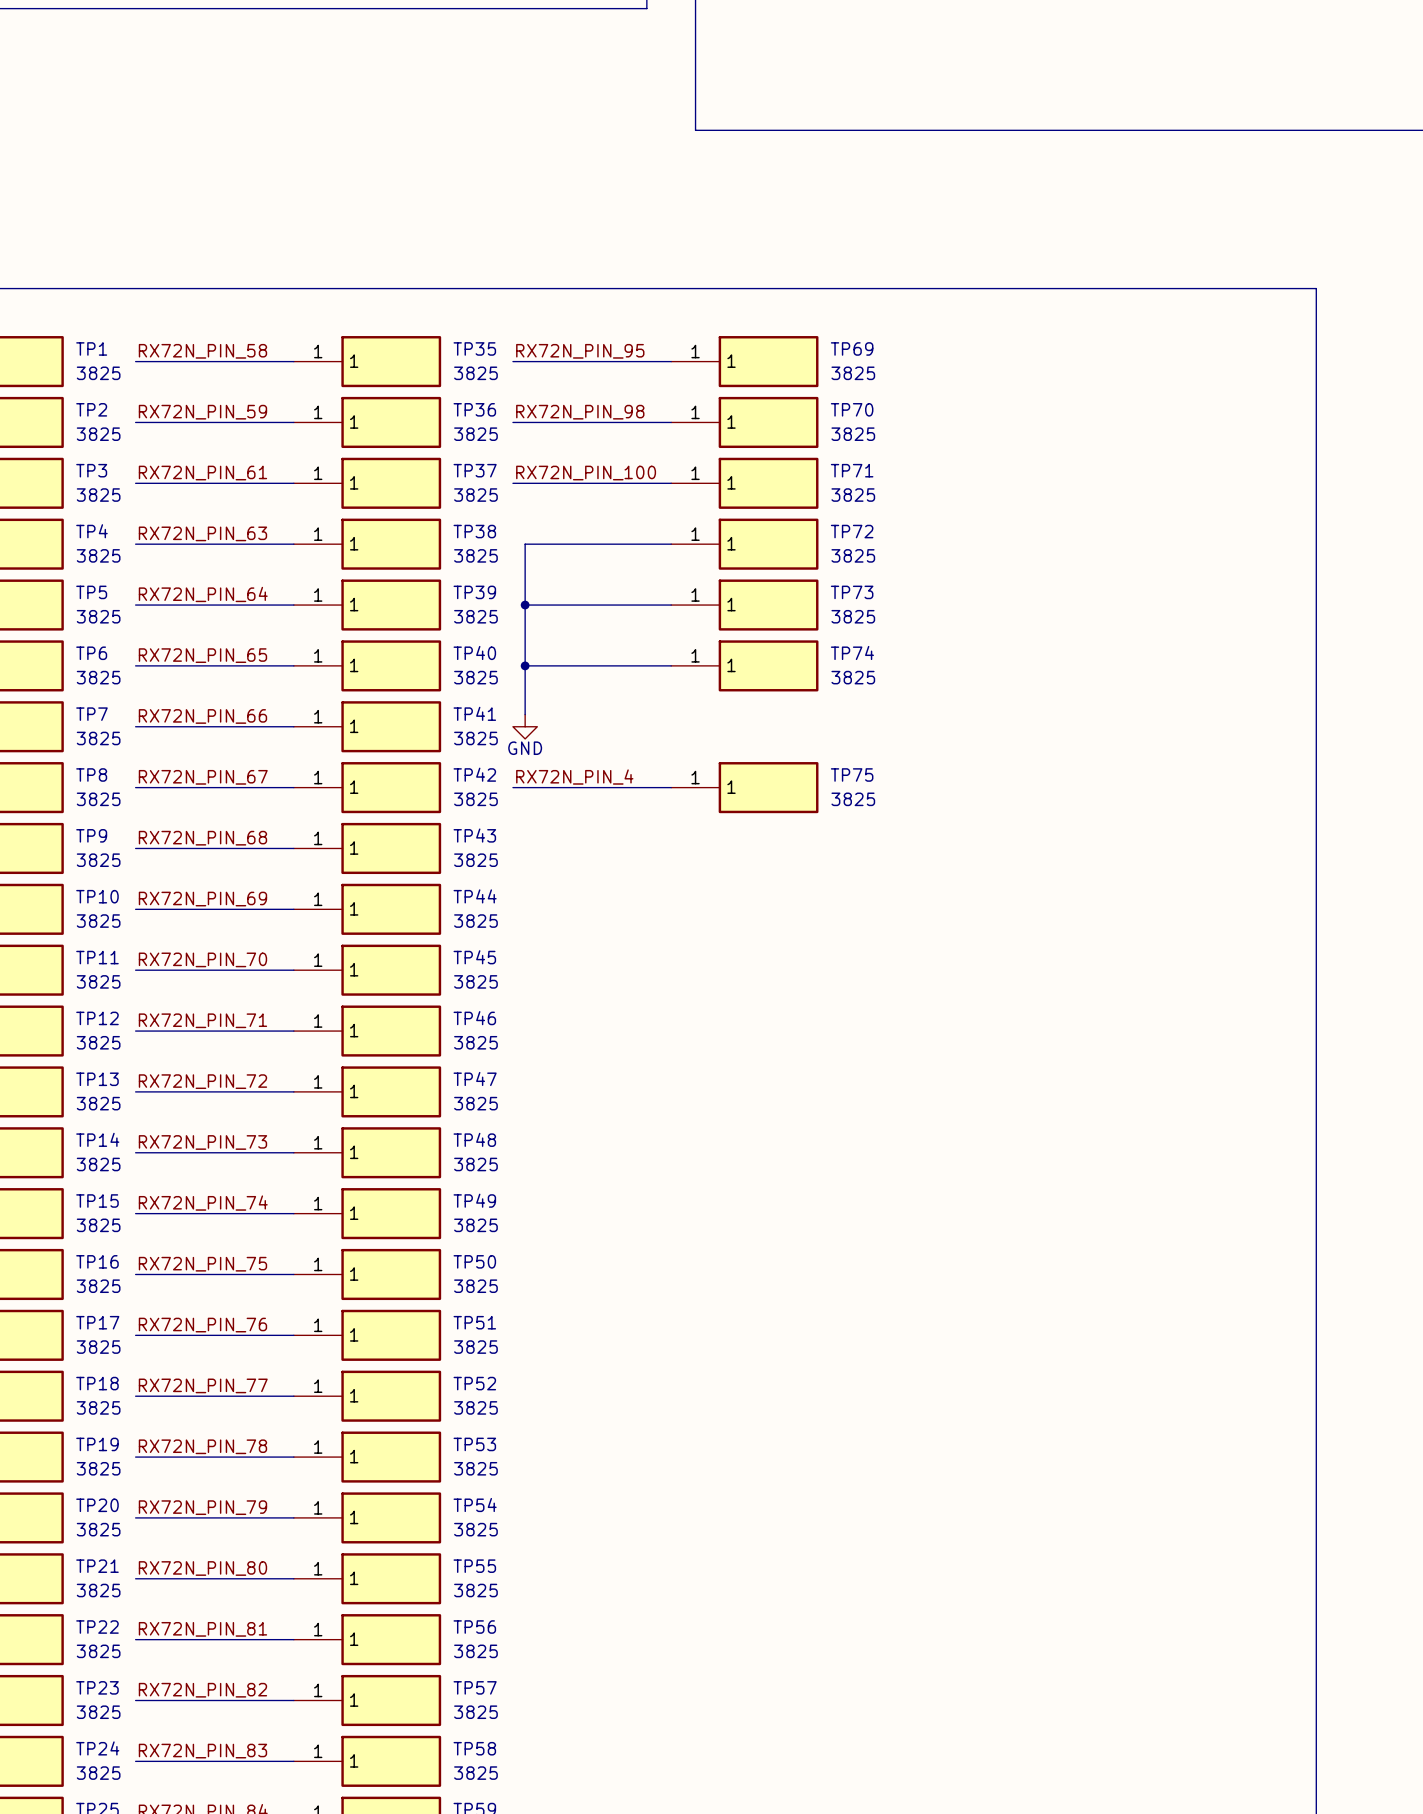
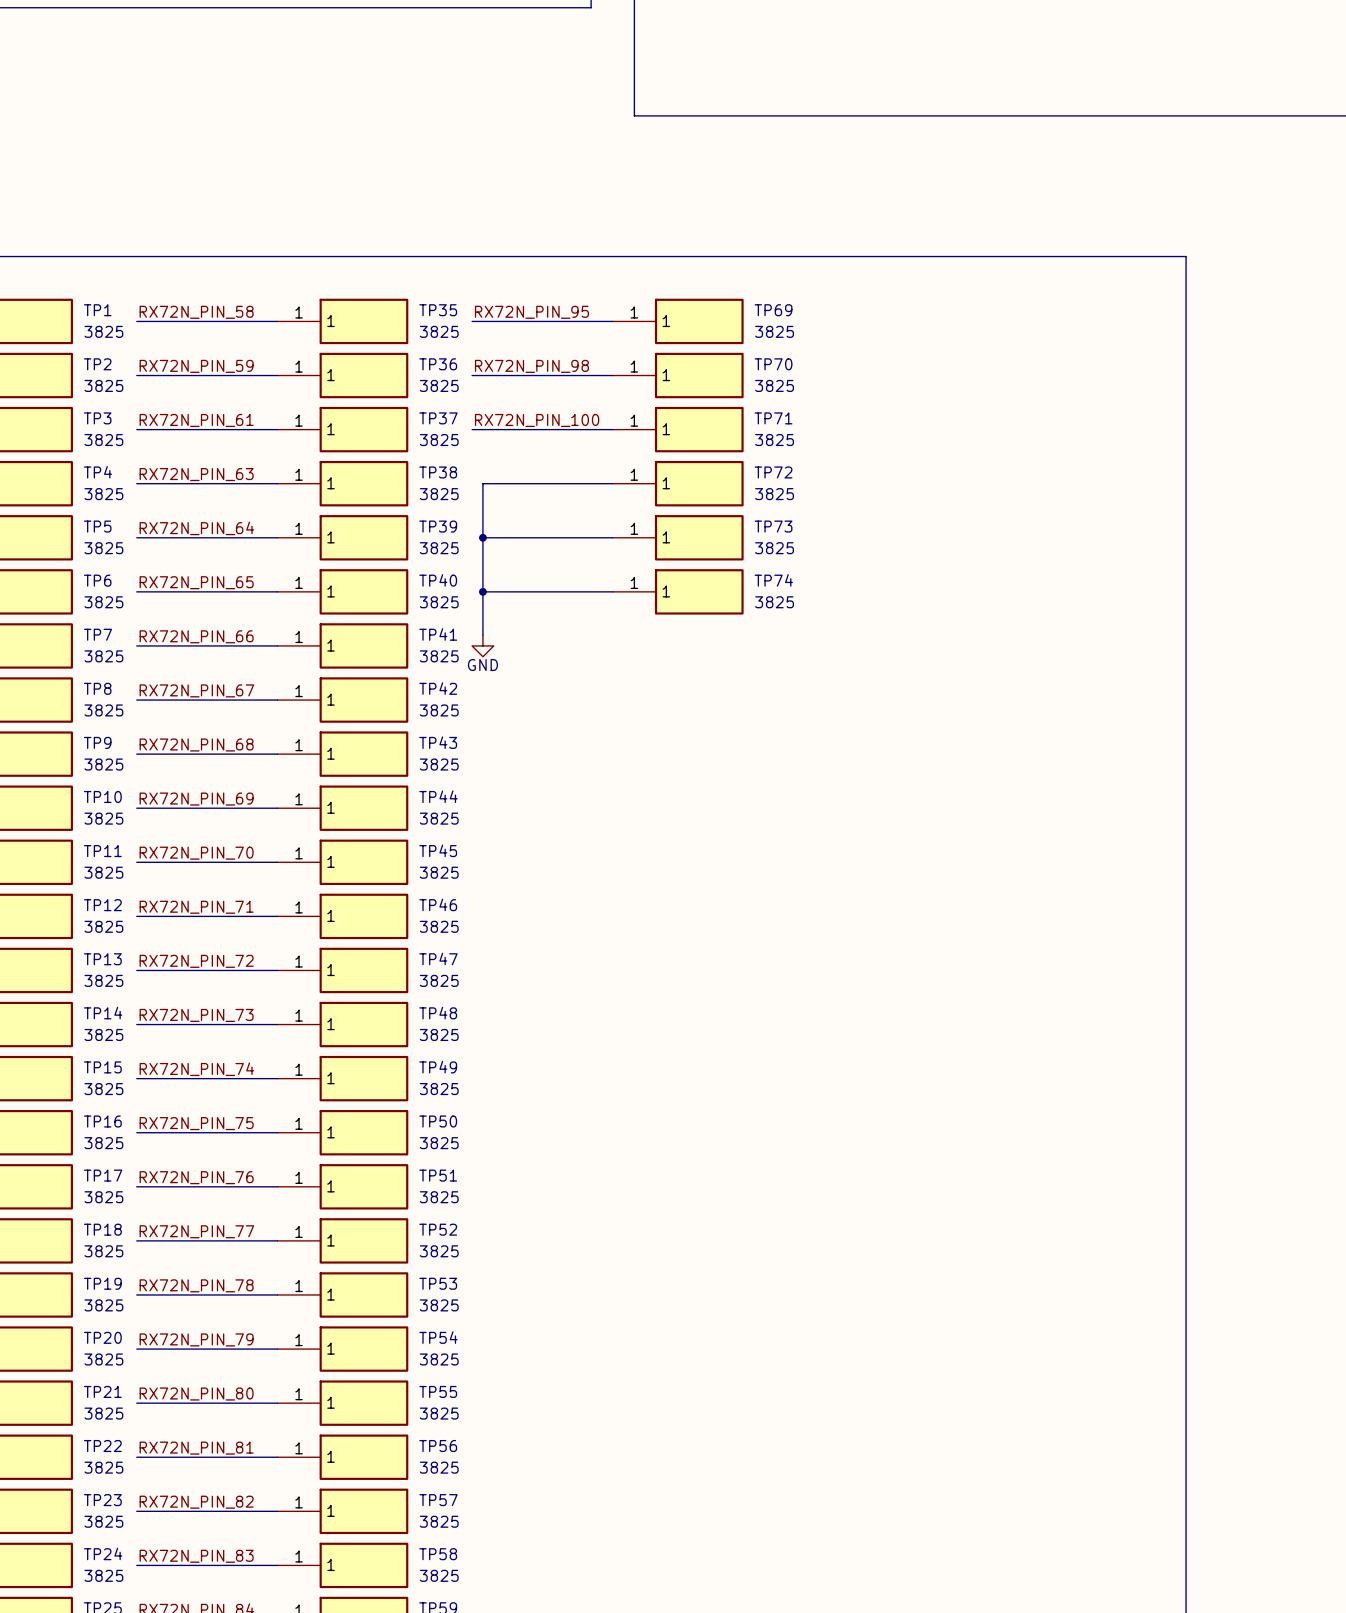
label: RX72N_PIN_4 (574, 777) -> none
wire: (512, 787) (671, 787) -> none
TP75: 3825 (744, 787) -> none

